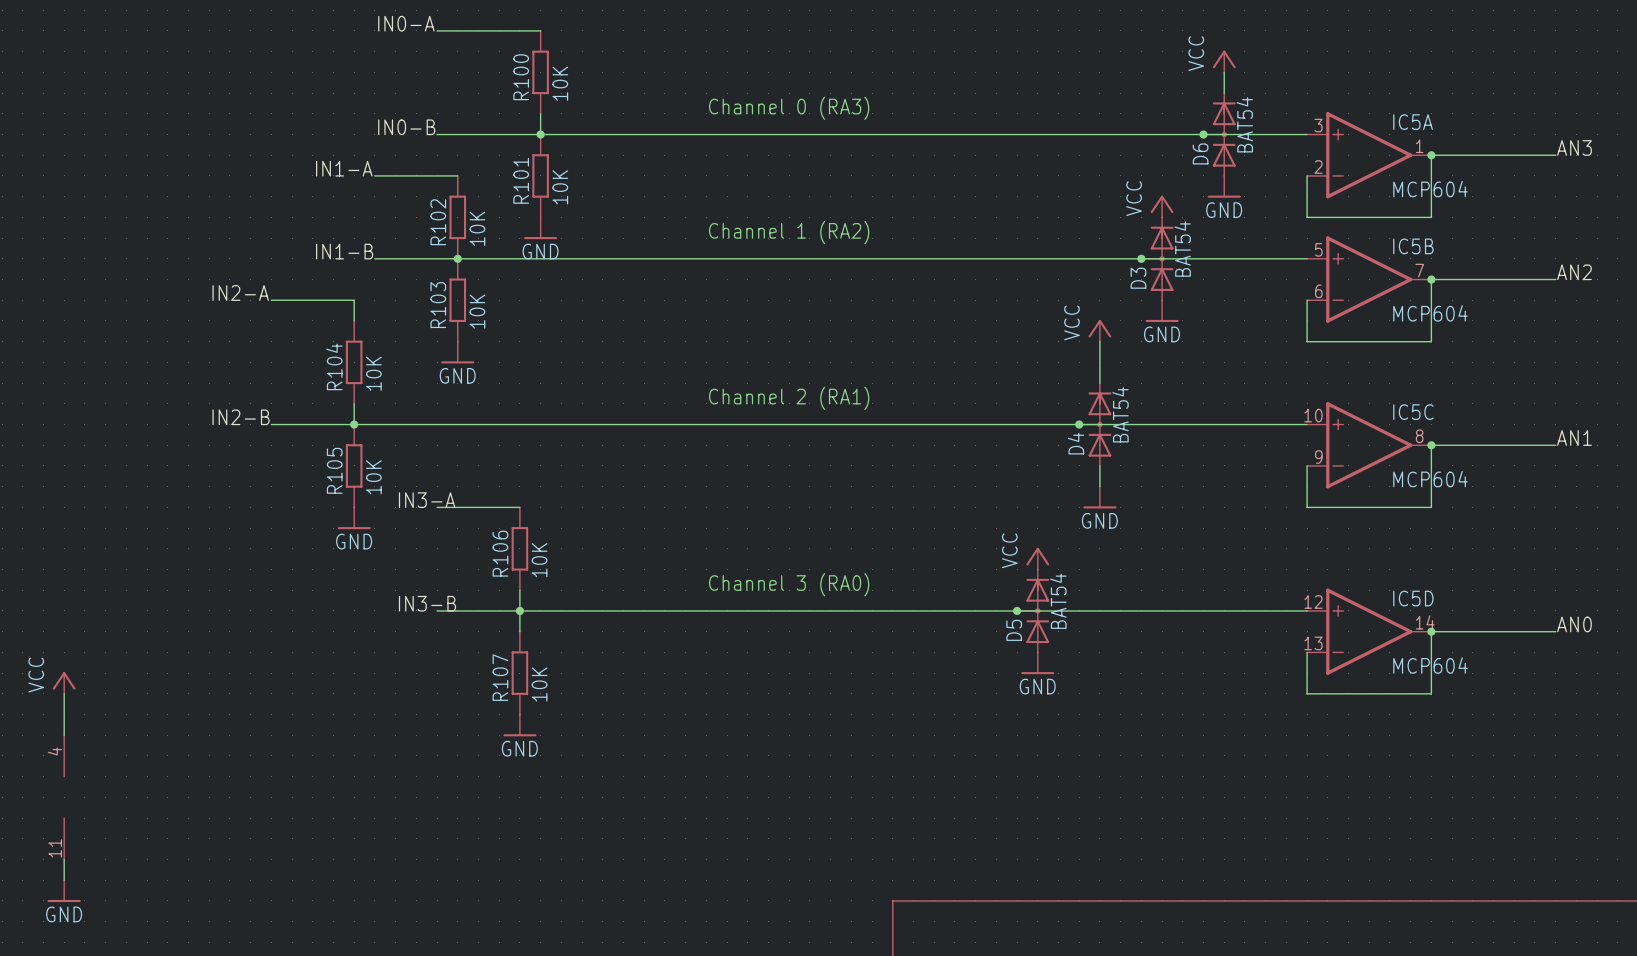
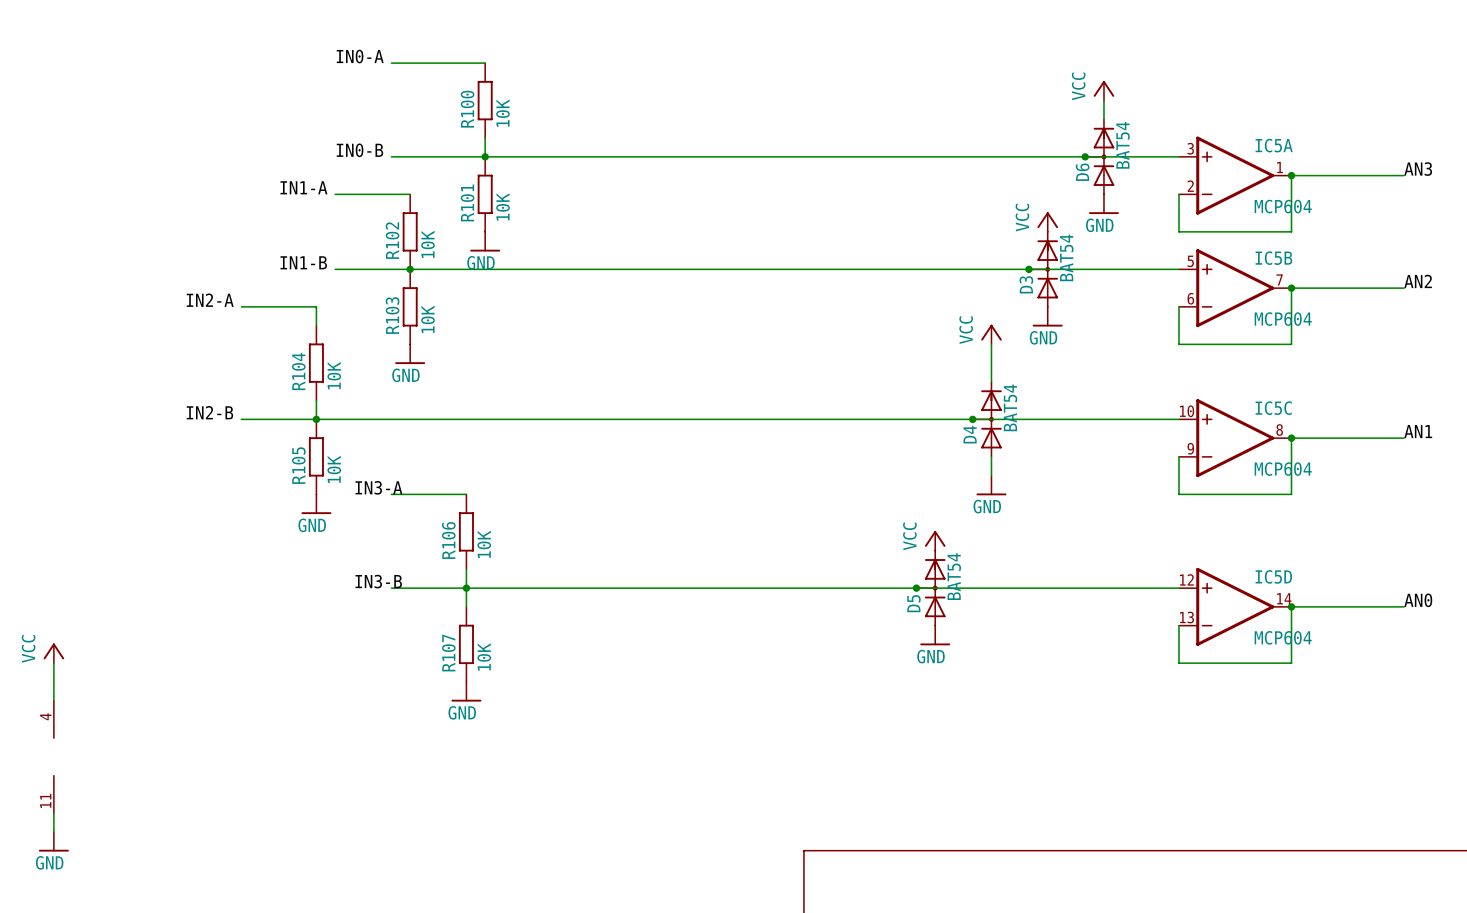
text: Channel 0 (RA3) (789, 108) -> none
text: Channel 1 (RA2) (789, 232) -> none
text: Channel 2 (RA1) (789, 398) -> none
text: Channel 3 (RA0) (789, 584) -> none

